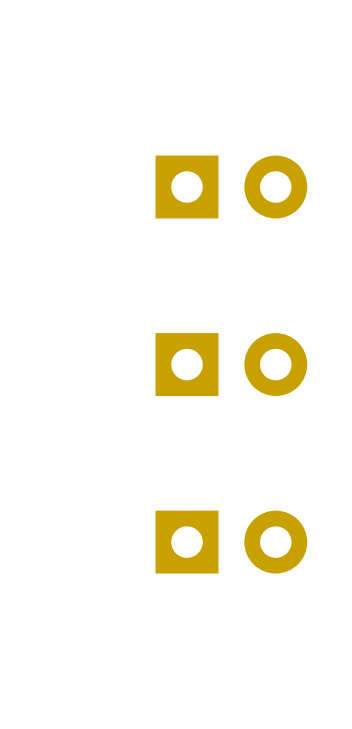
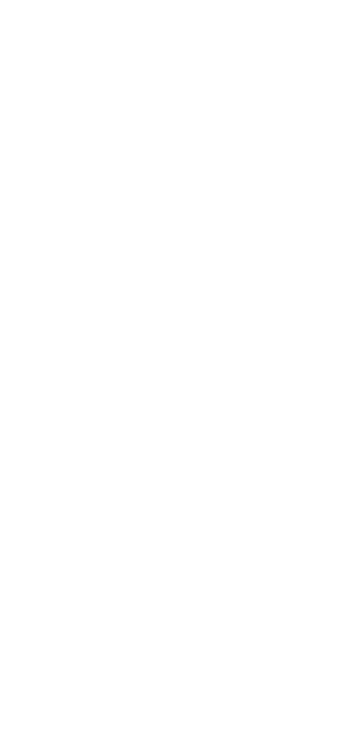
part: (231, 187) -> none
part: (231, 364) -> none
part: (231, 542) -> none

